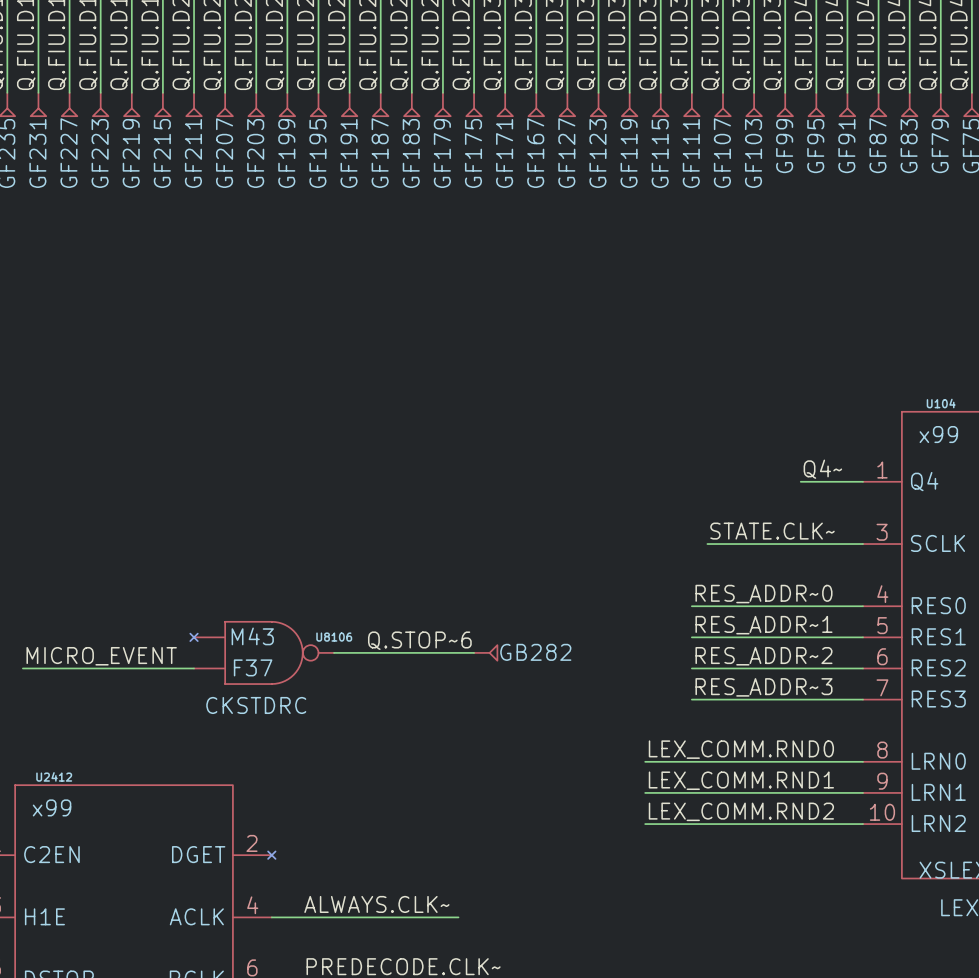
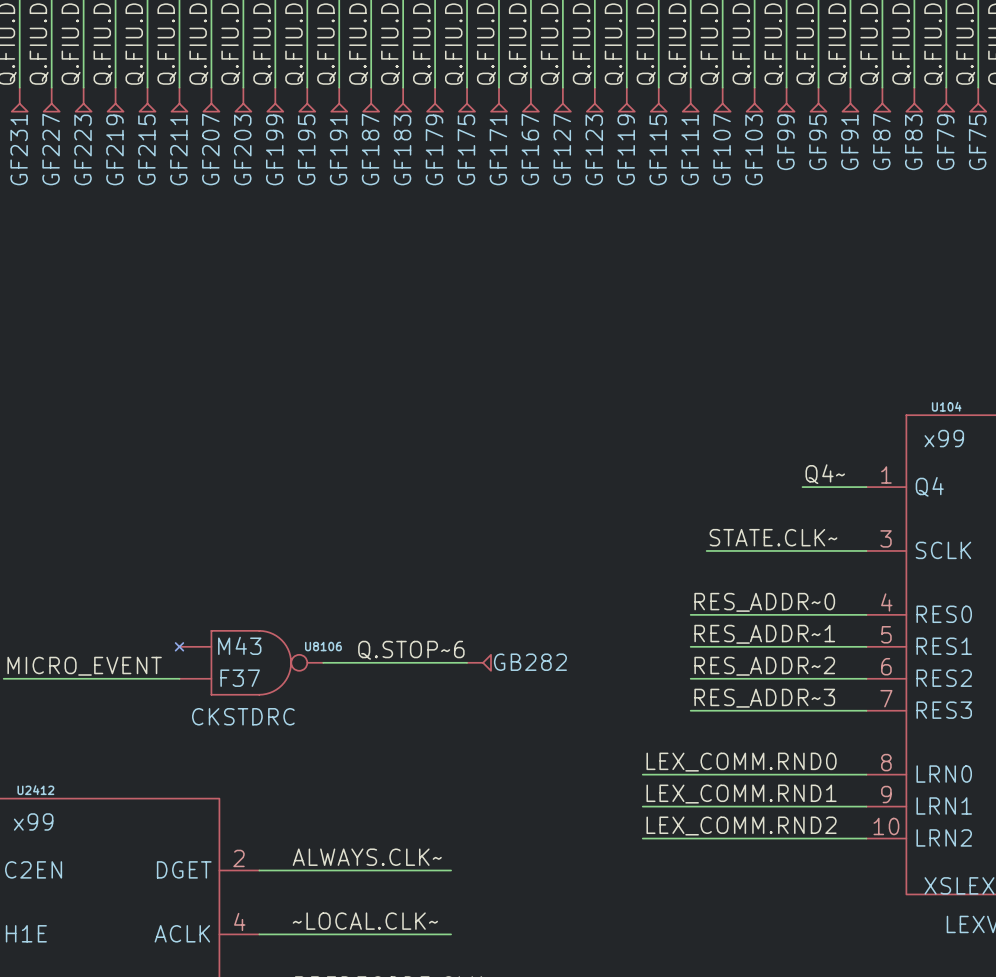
label: none -> ALWAYS.CLK~ (367, 857)
wire: none -> (259, 870) (451, 870)
no-connect mark: (271, 855) -> none
label: ALWAYS.CLK~ (376, 904) -> ~LOCAL.CLK~ (365, 921)

